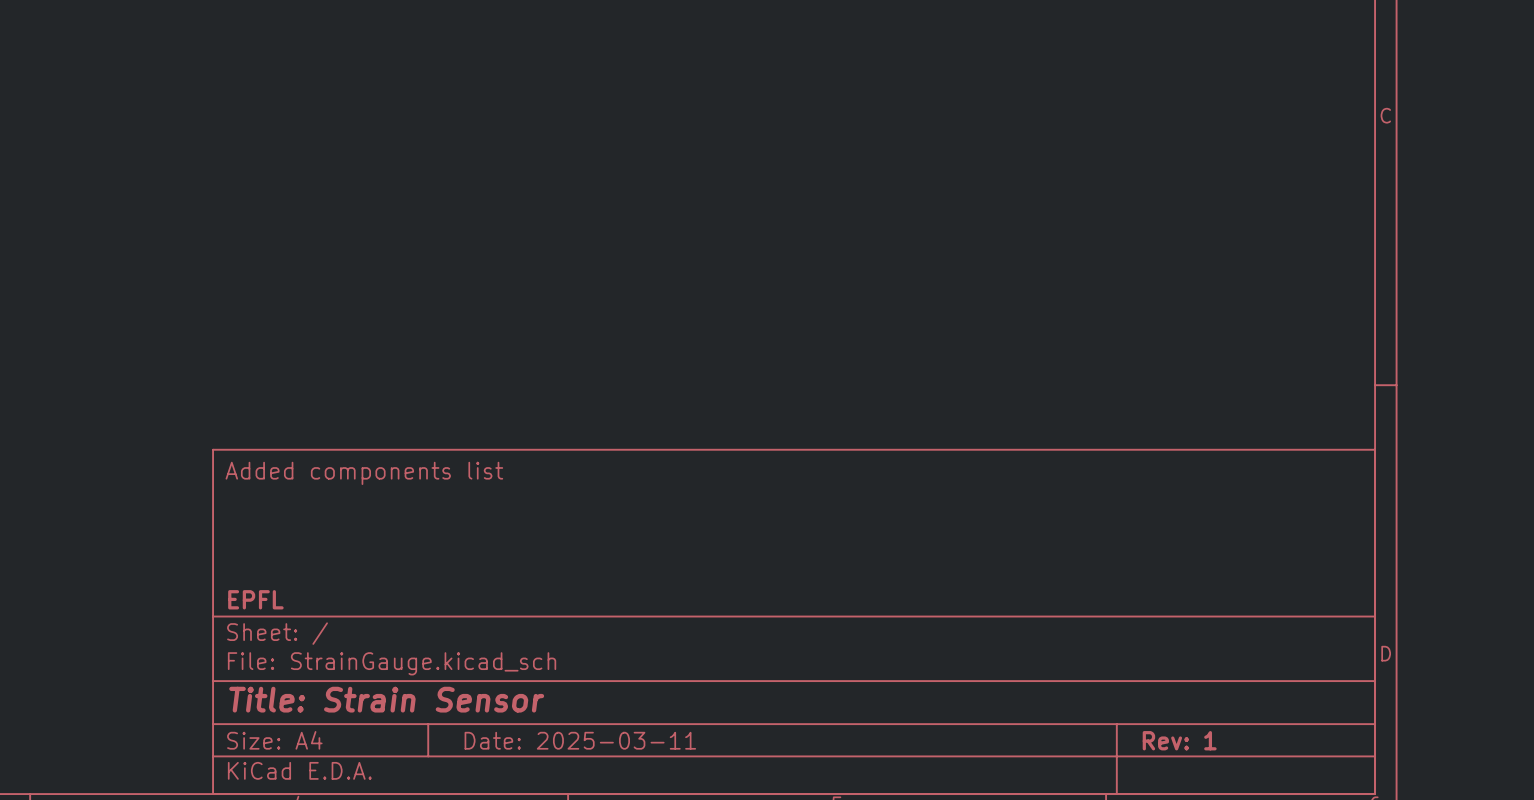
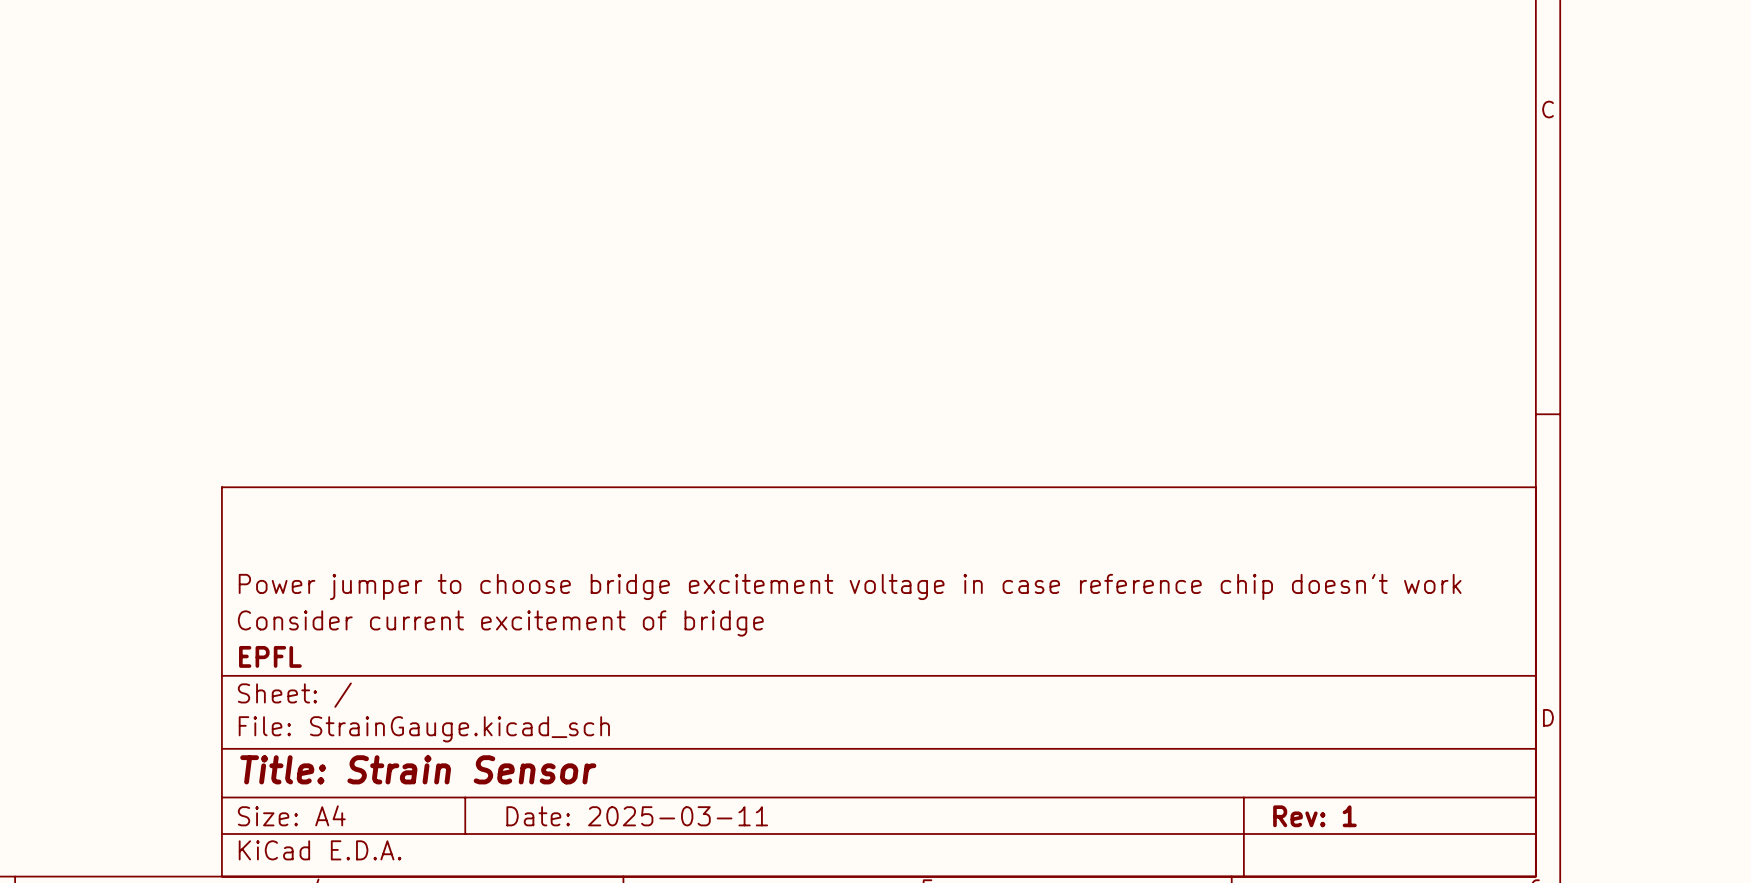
title block: Added components list (364, 473) -> none
title block: none -> Power jumper to choose bridge excitement voltage in case reference chip doesn't work (850, 586)
title block: none -> Consider current excitement of bridge (500, 623)

